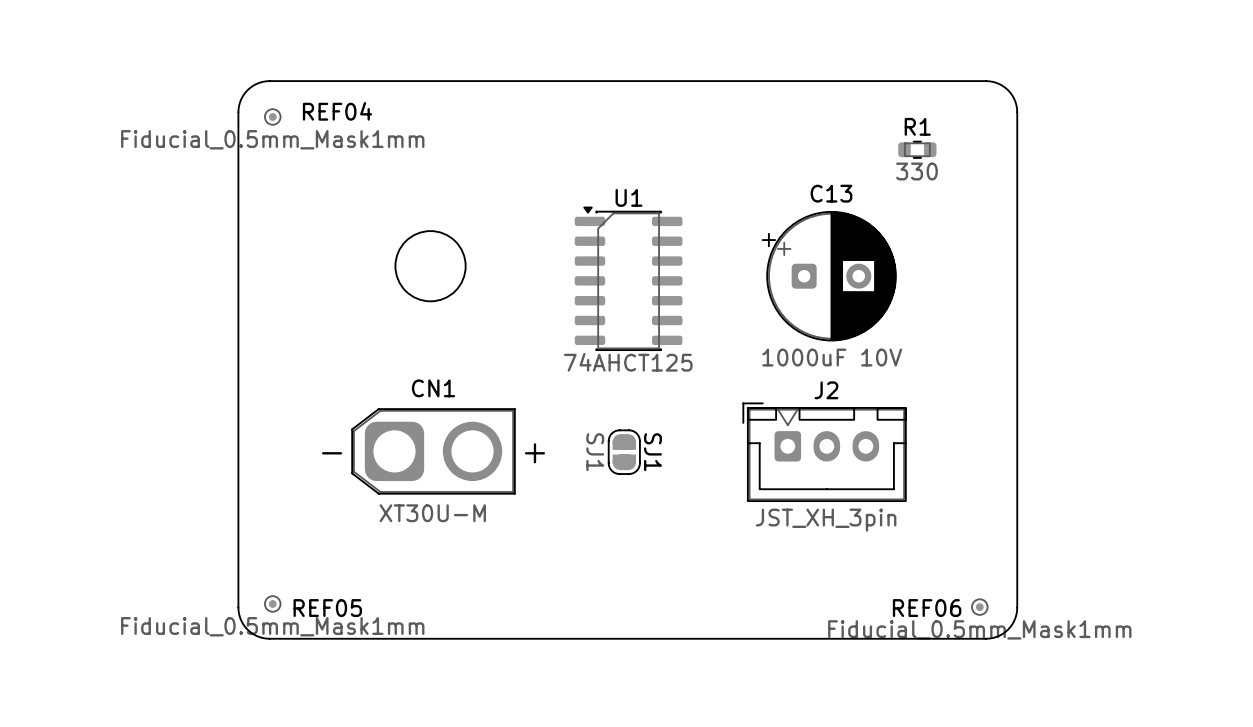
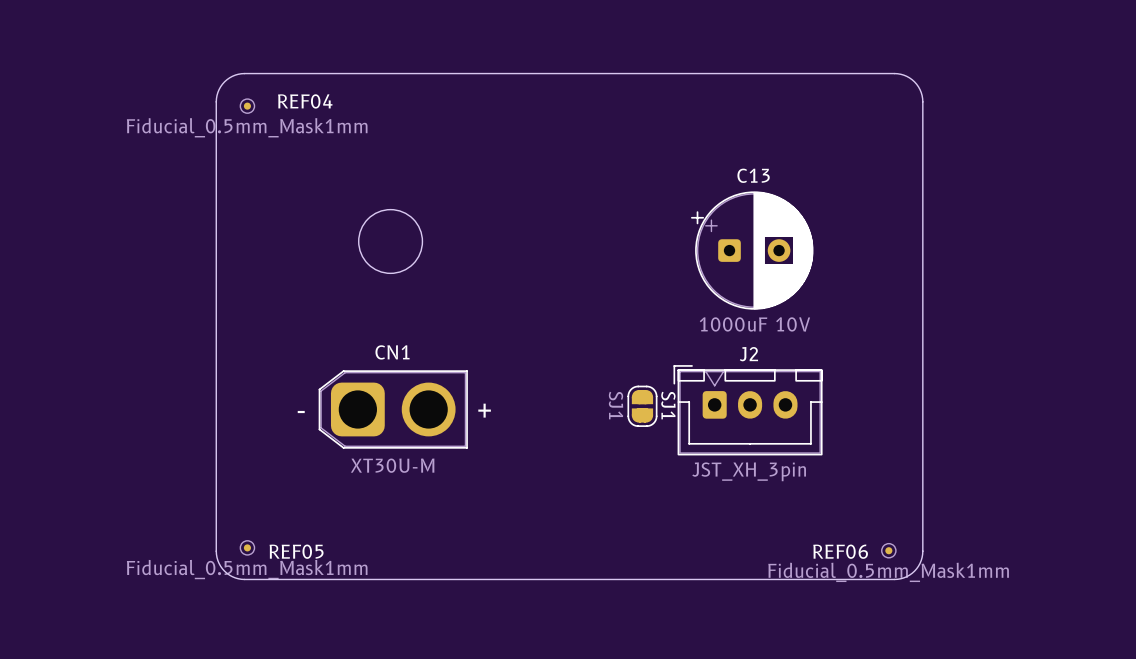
R1: 330 (917, 149) -> none
U1: 74AHCT125 (628, 278) -> none
SJ1 position: (624, 452) -> (642, 406)

